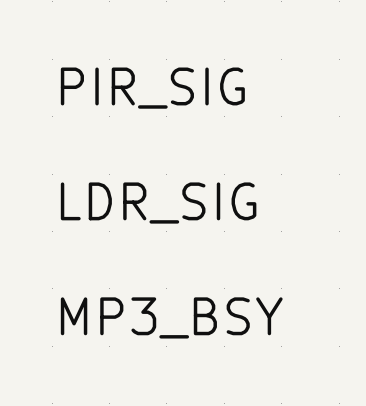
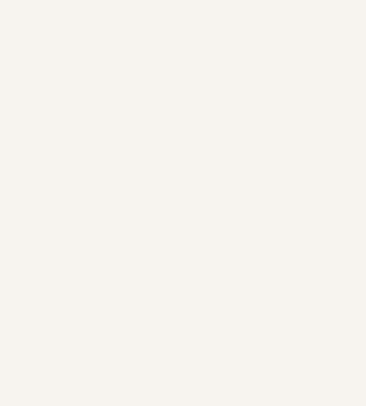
label: PIR_SIG (152, 88) -> none
label: LDR_SIG (158, 203) -> none
label: MP3_BSY (171, 317) -> none

